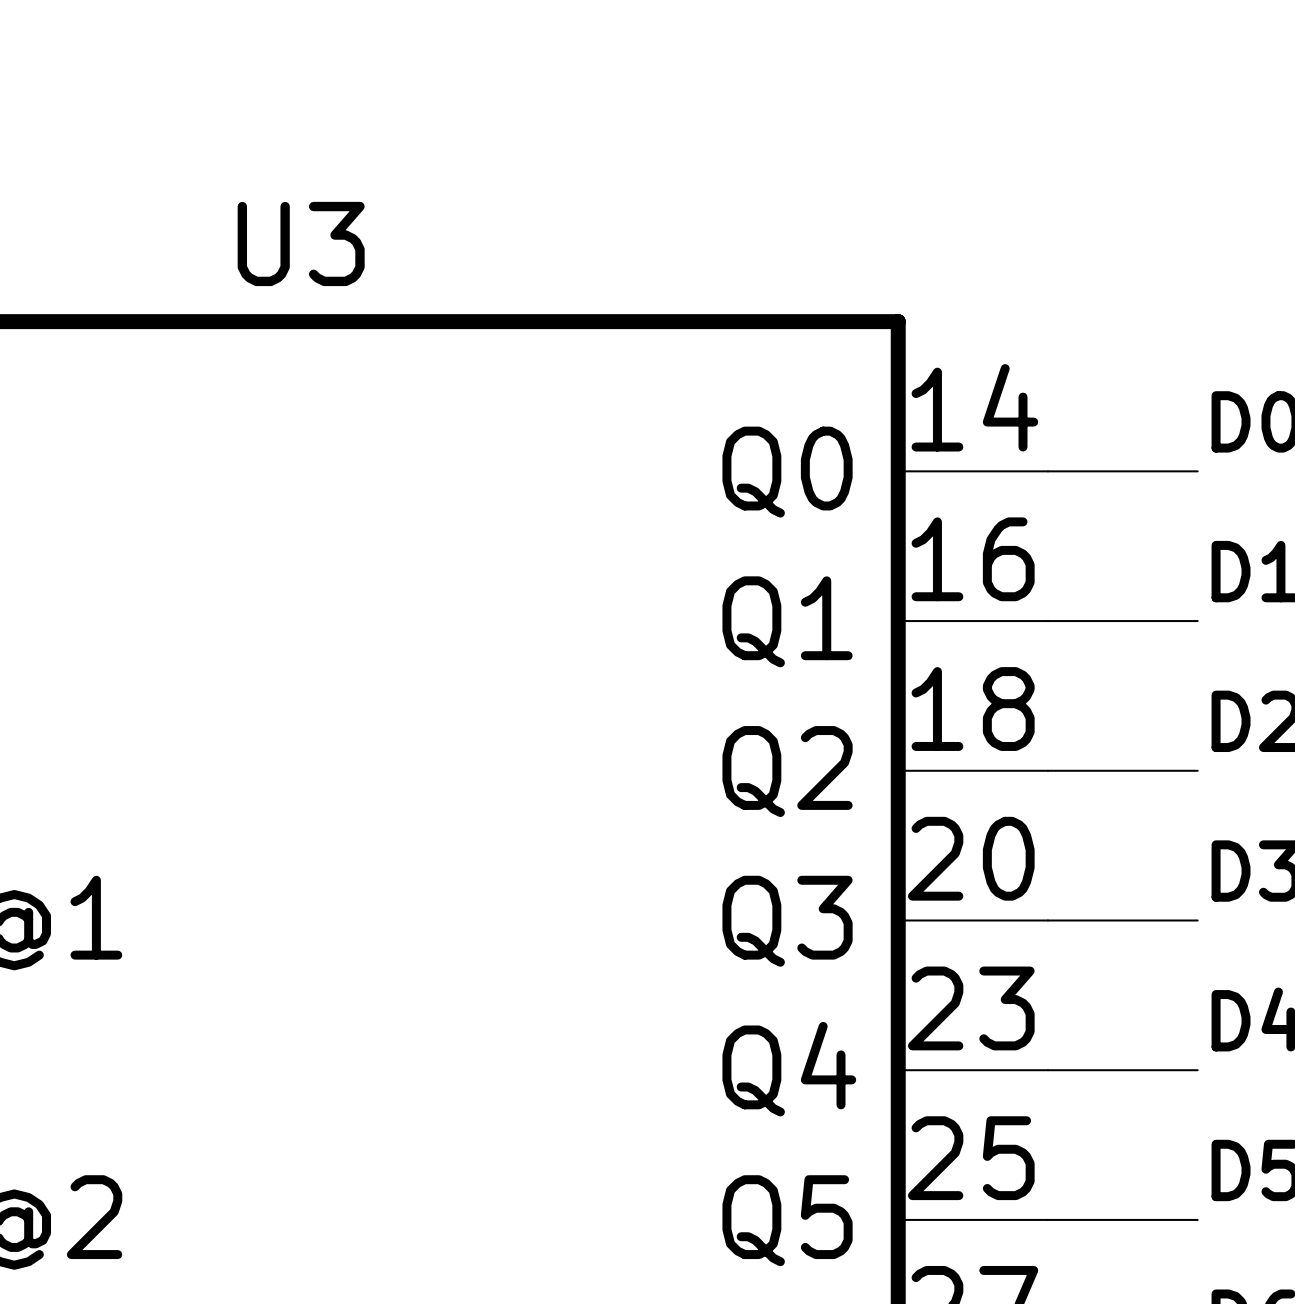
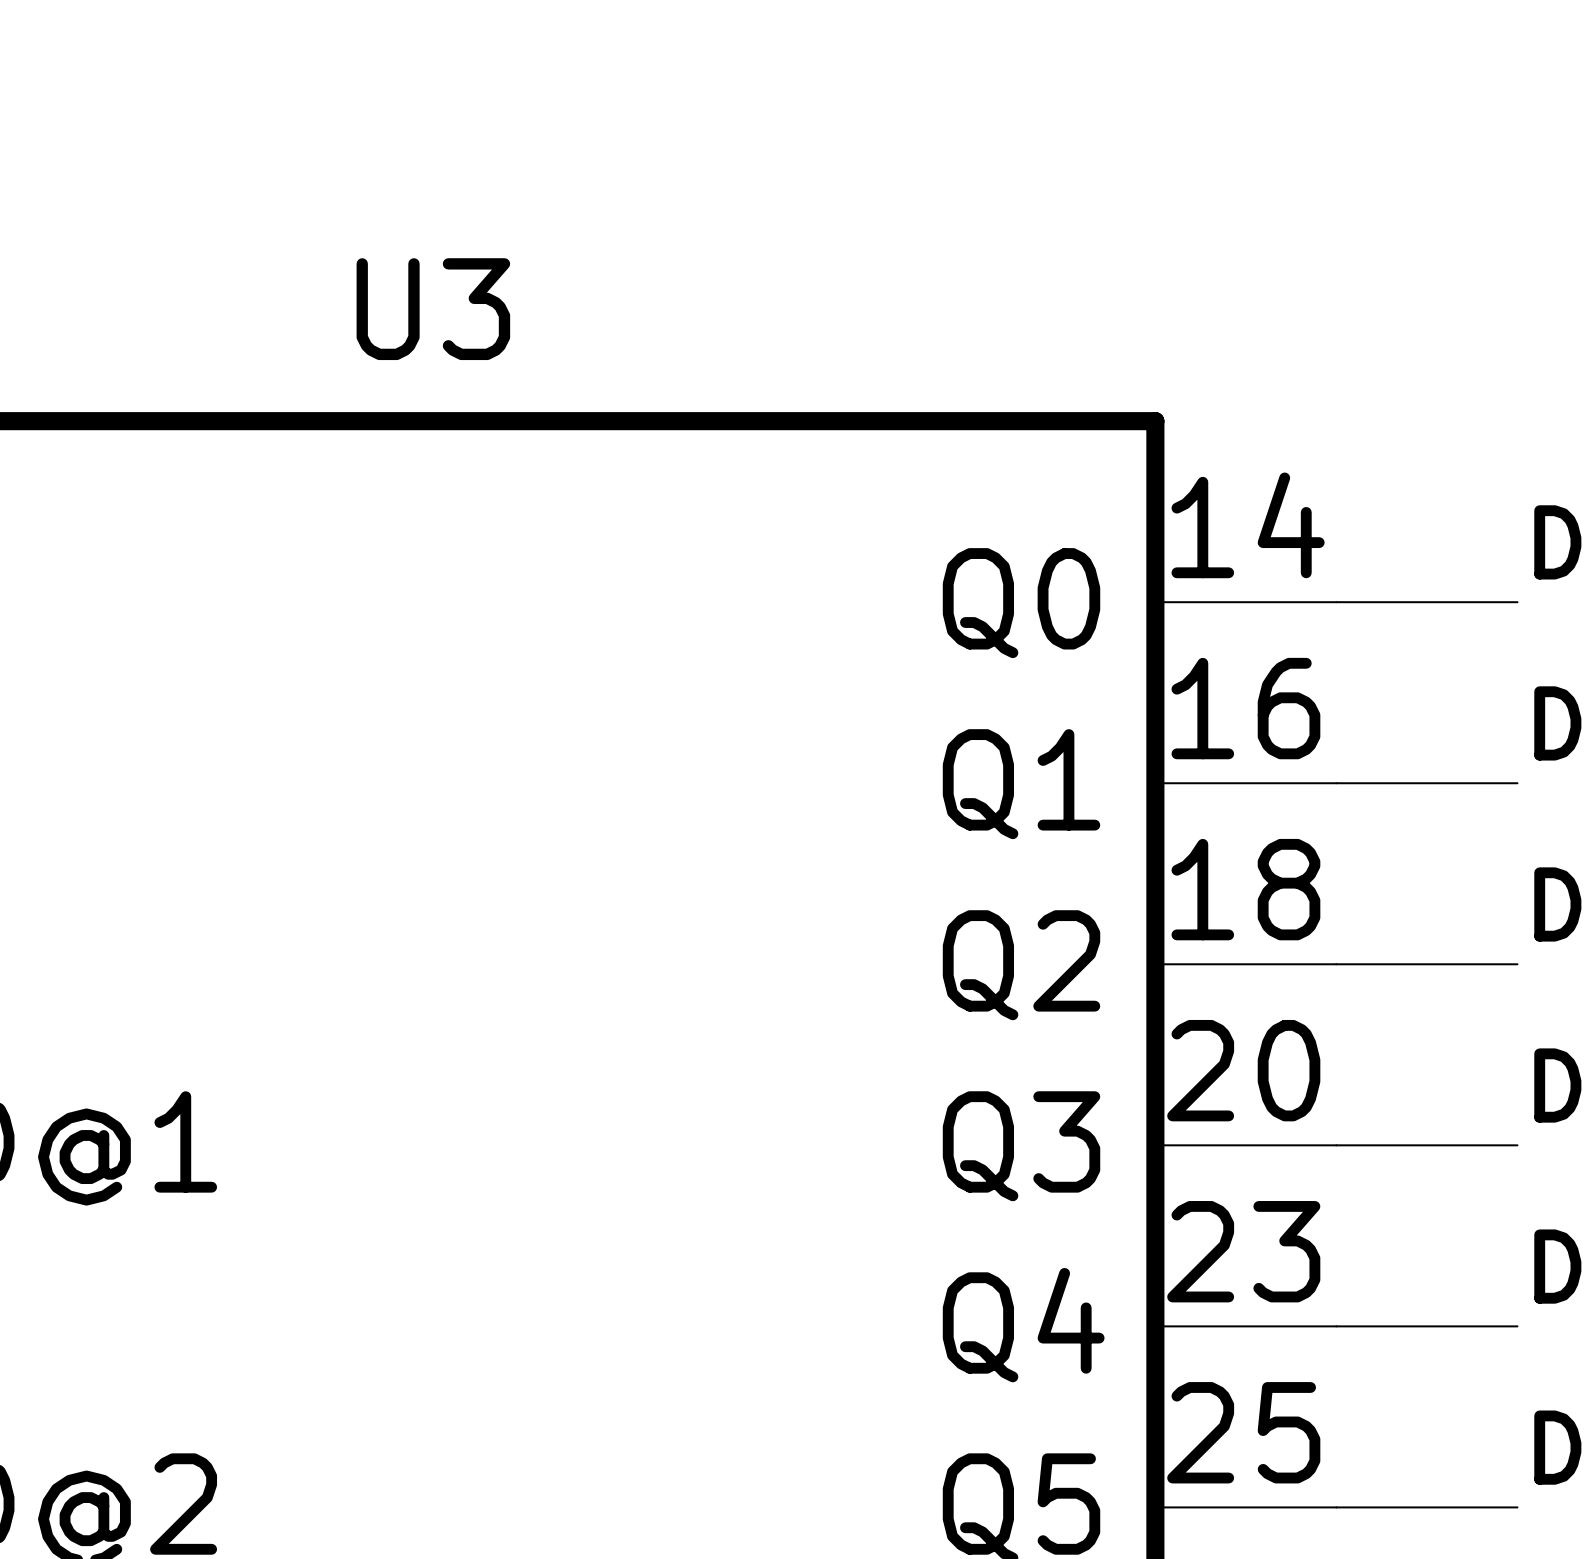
U3 name position: U3 (301, 243) -> U3 (433, 309)

